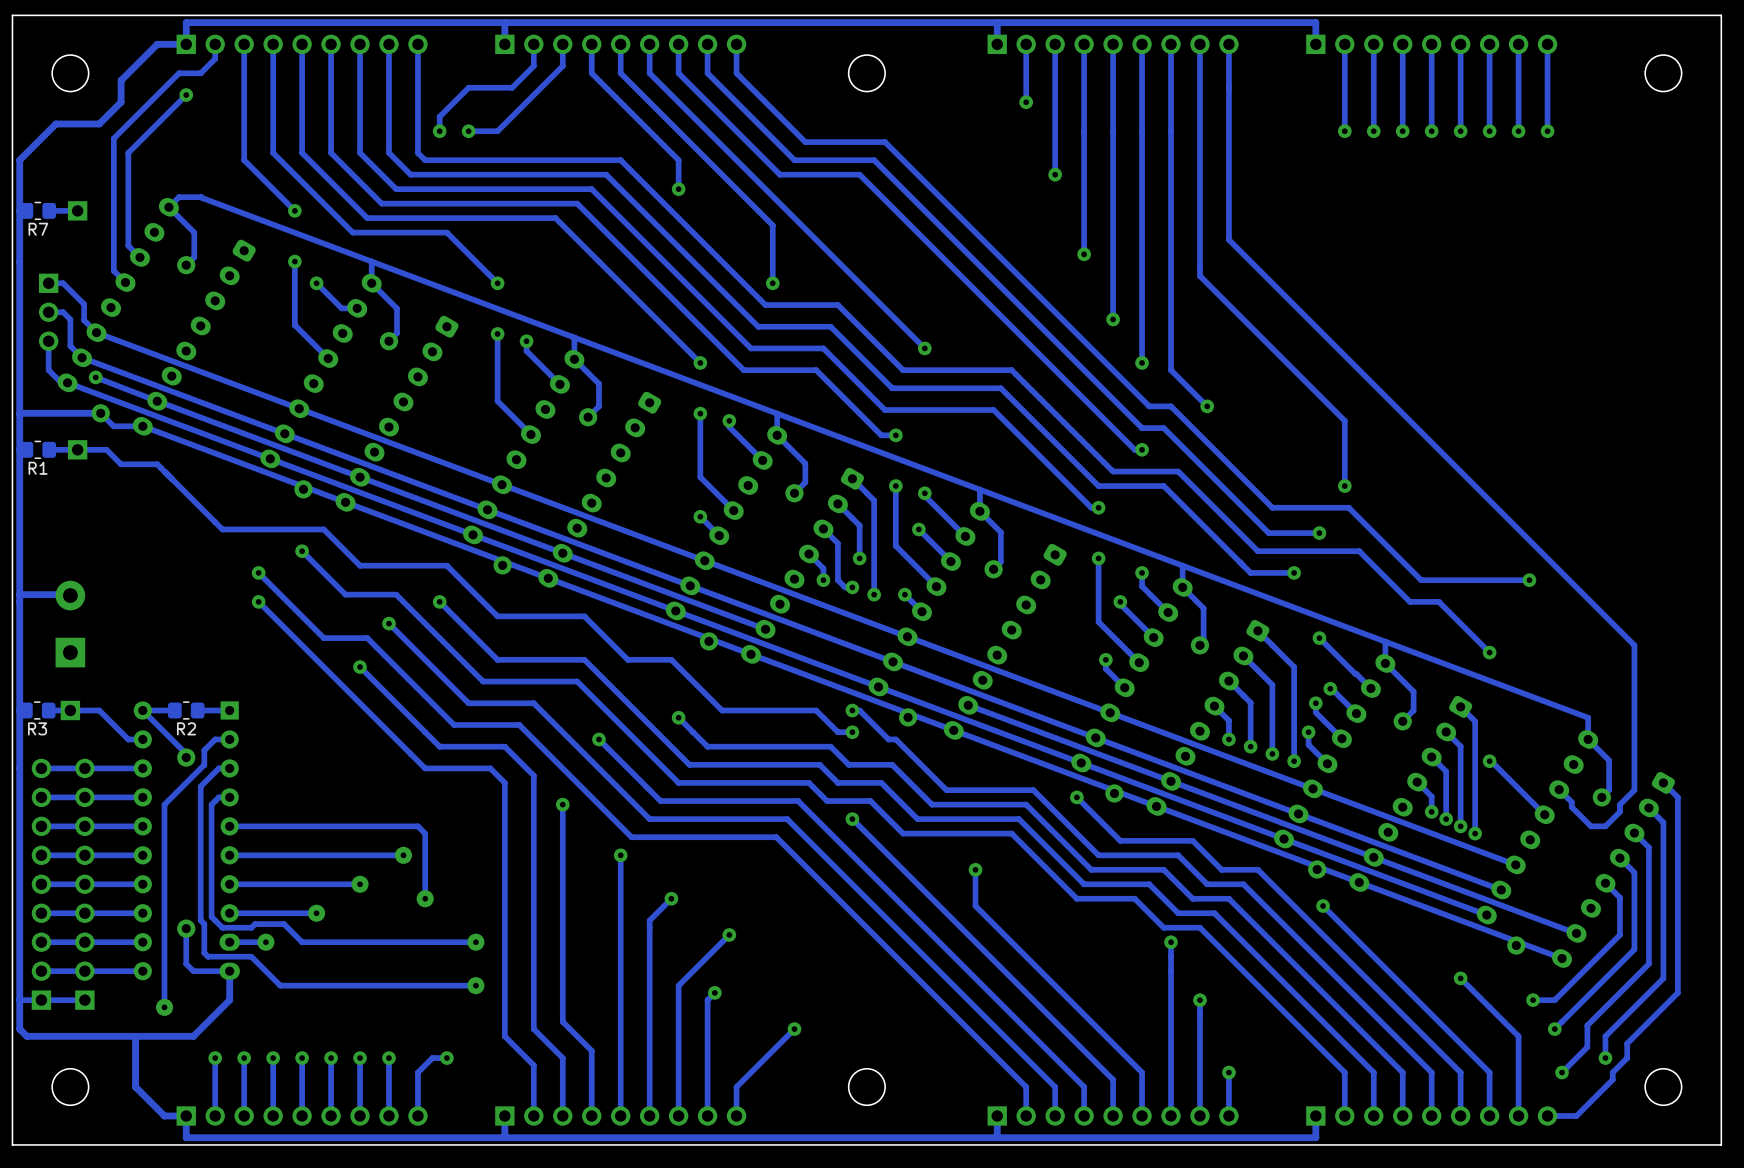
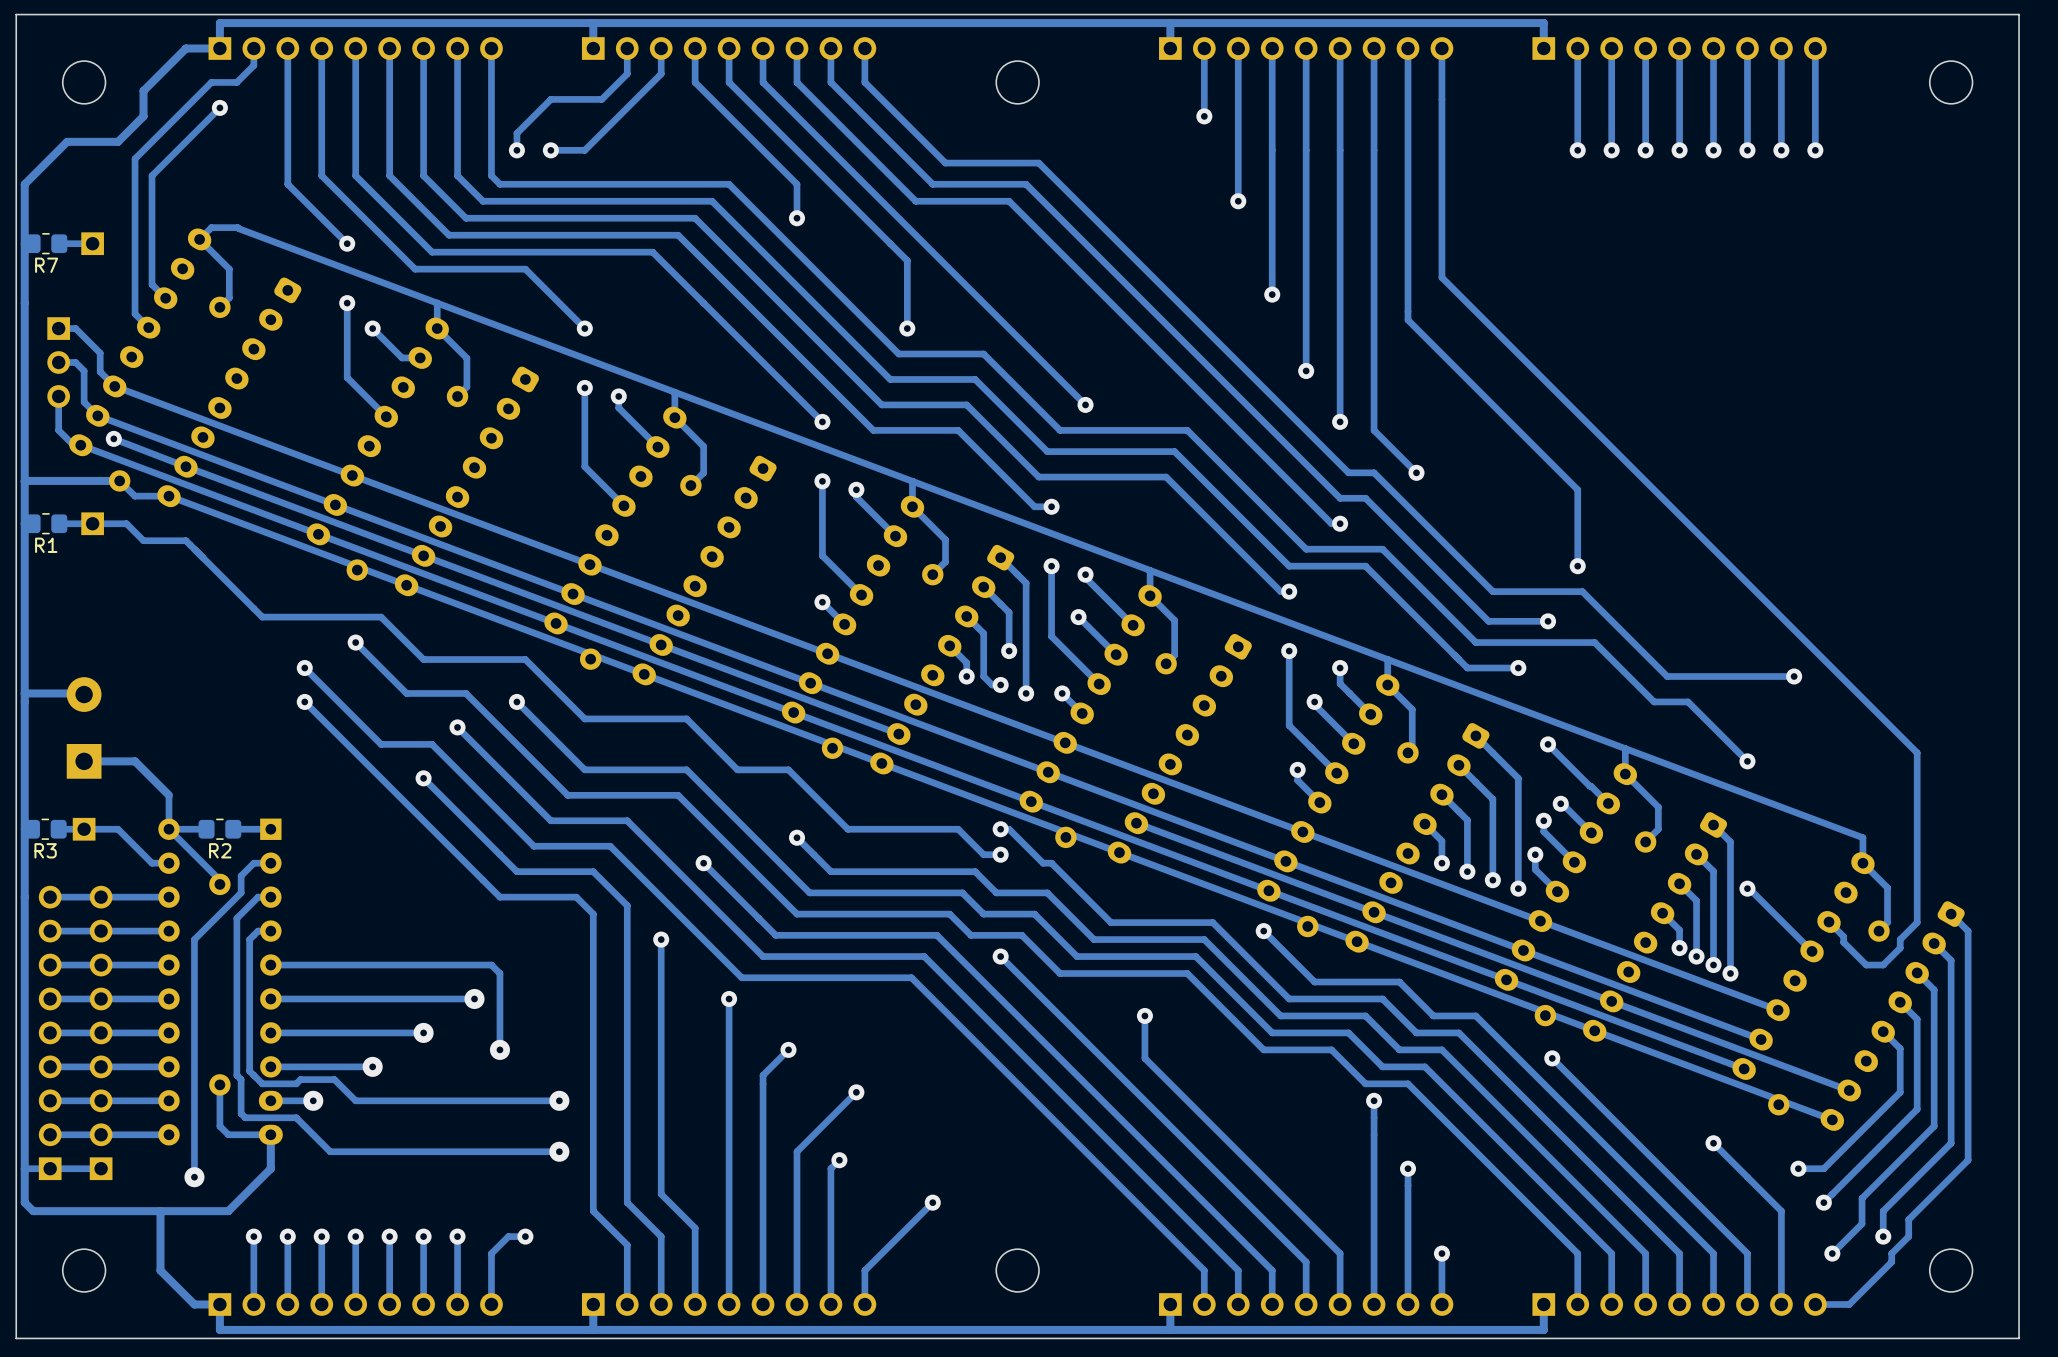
track: none -> (84, 761) (135, 761) (168, 795) (168, 829)

